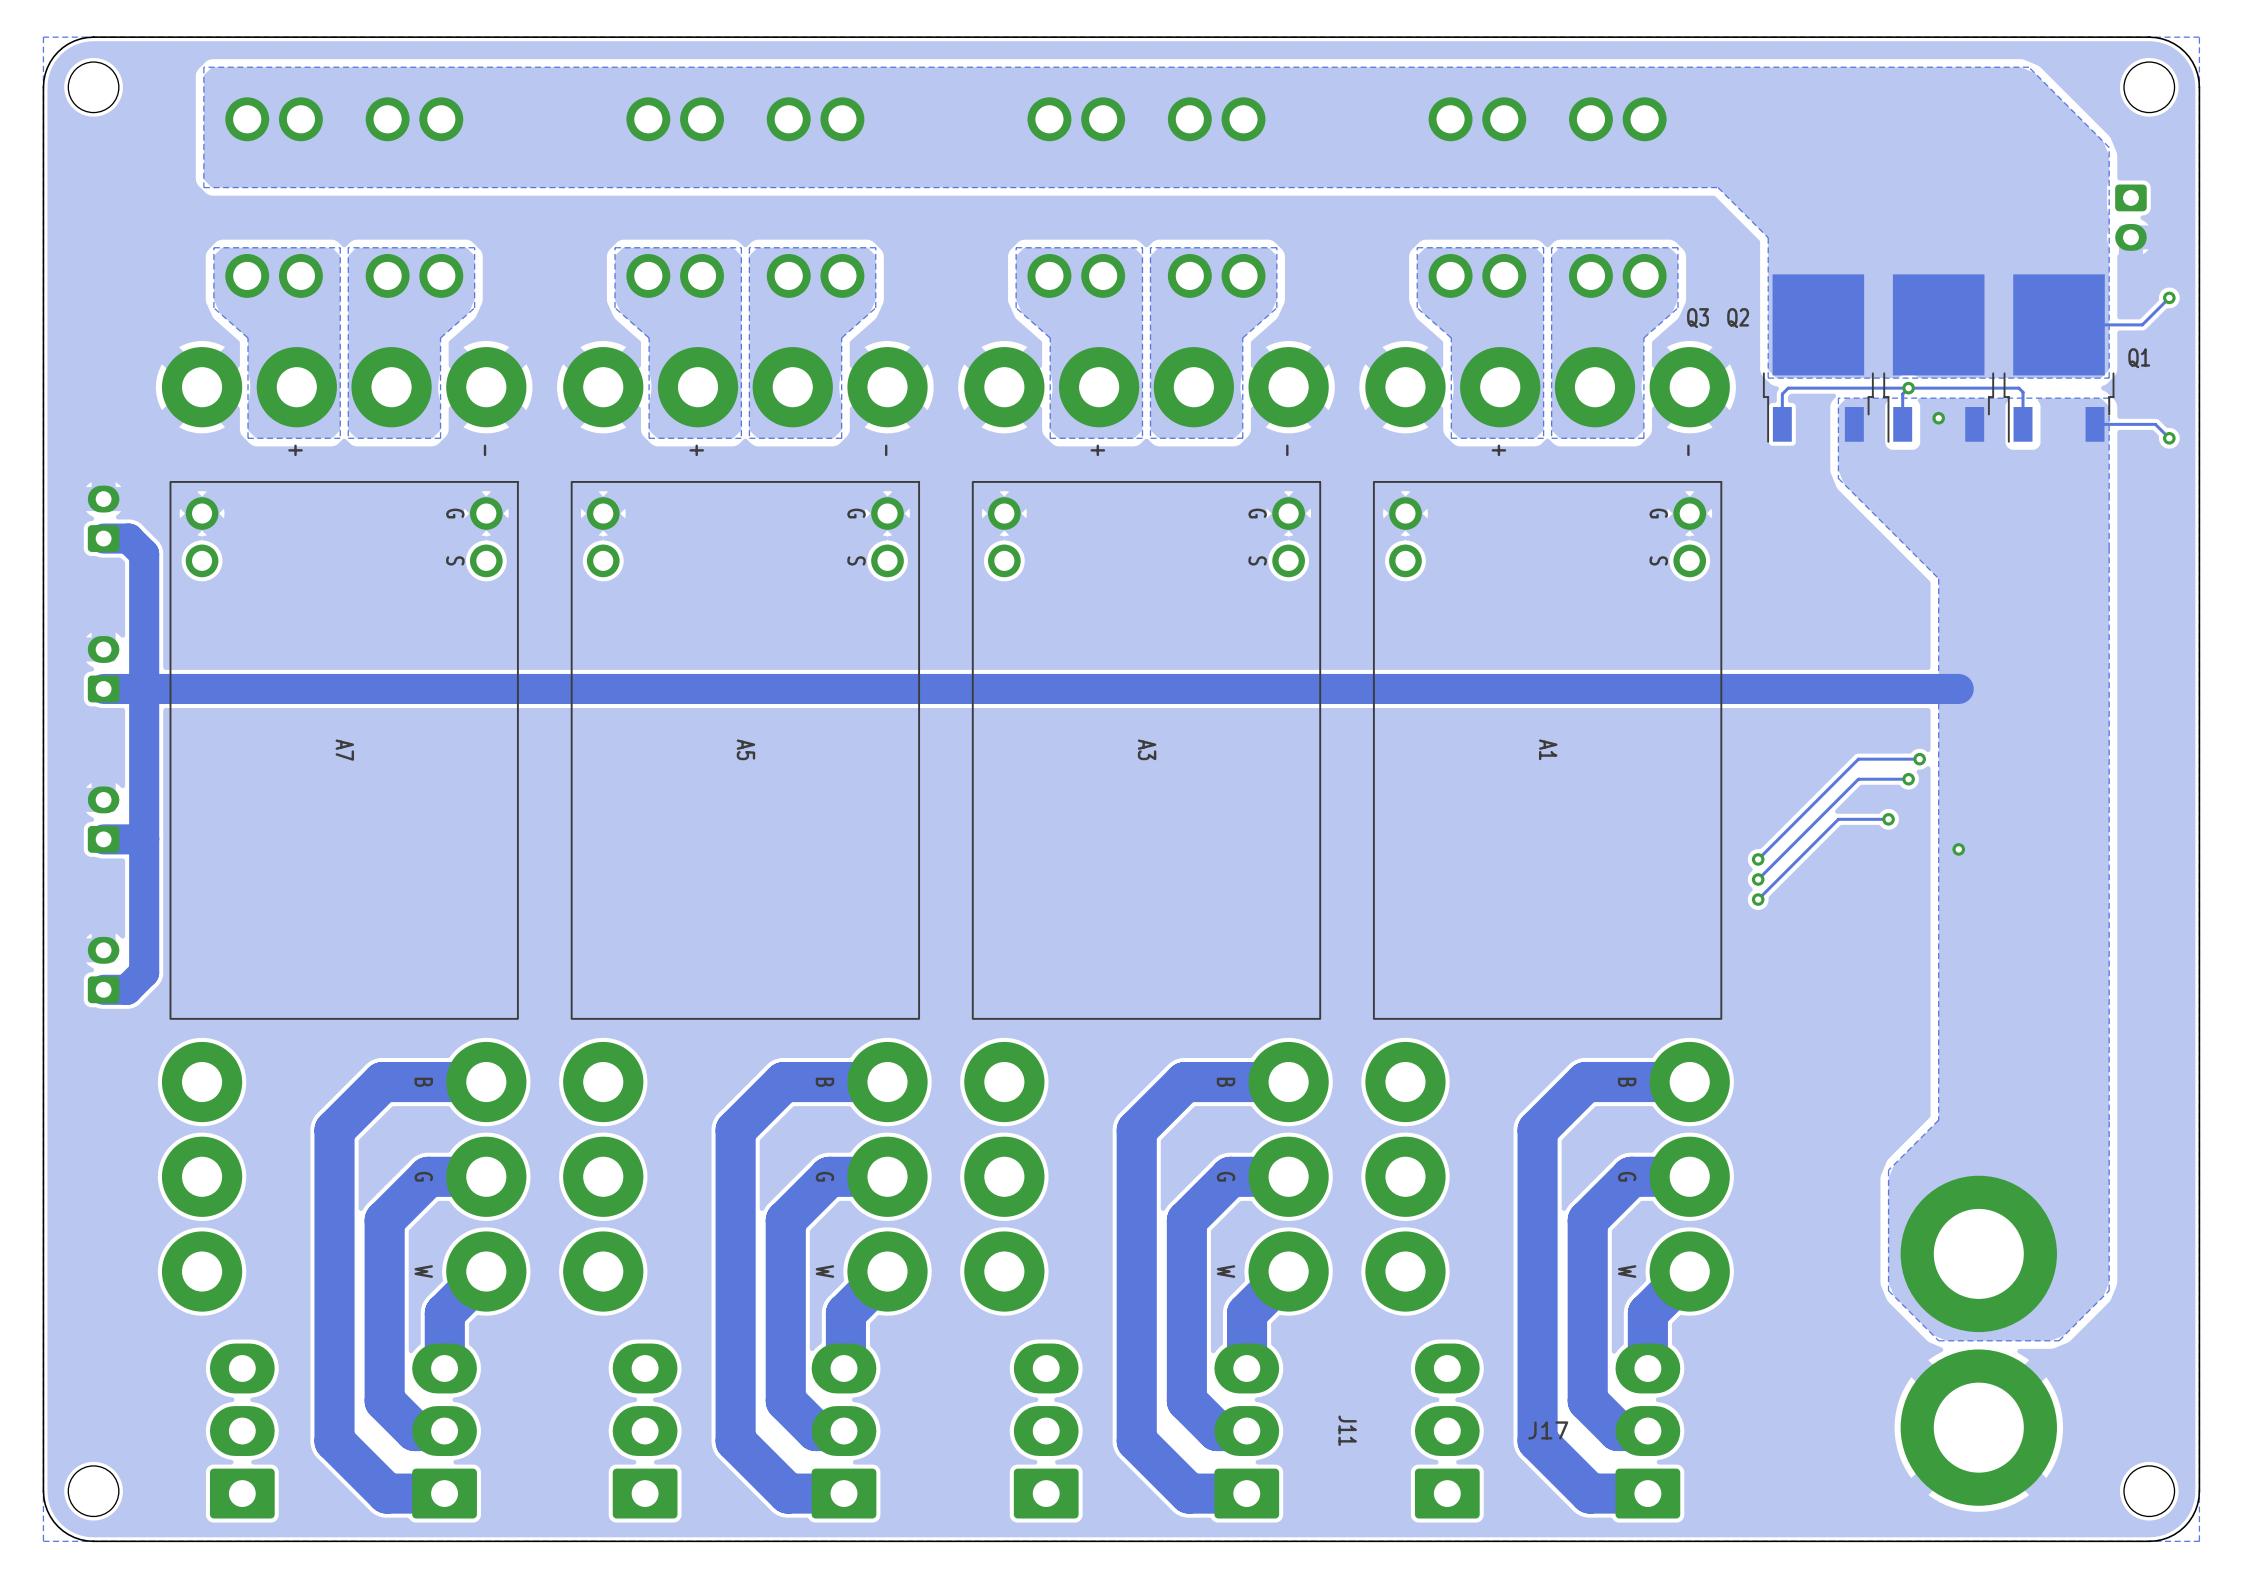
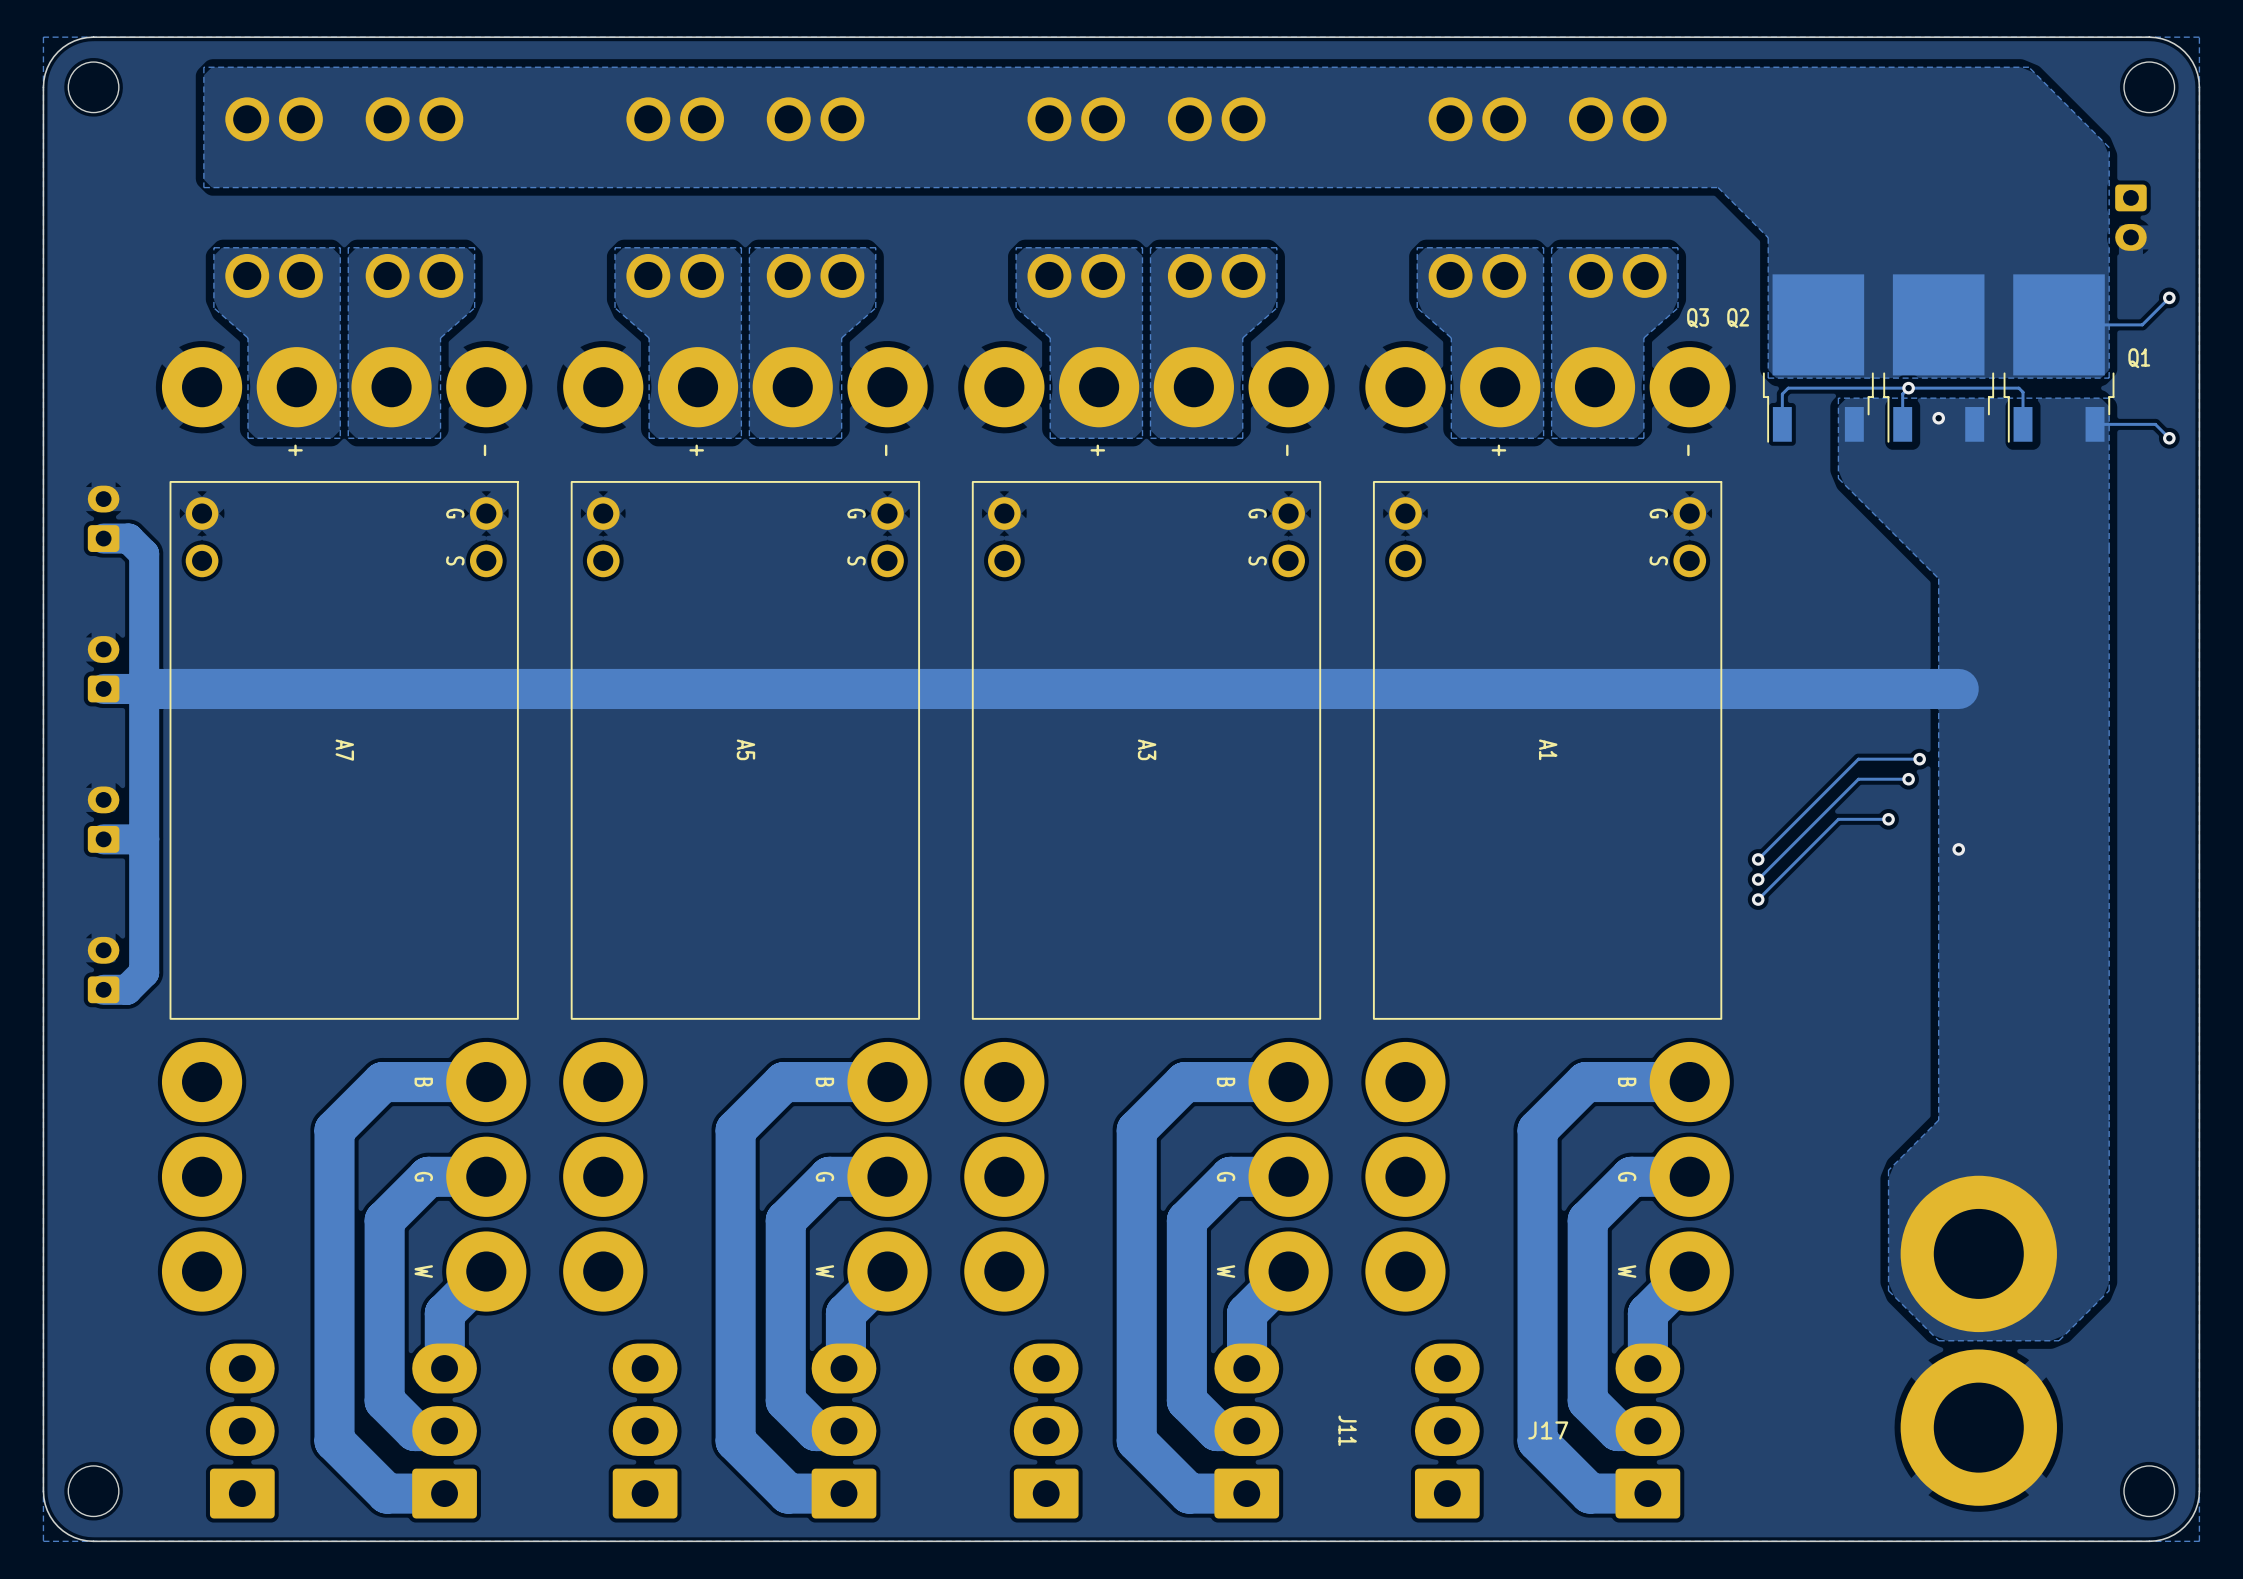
track width: thin (1958, 688) (143, 688) -> thick (1958, 688) (143, 688)

